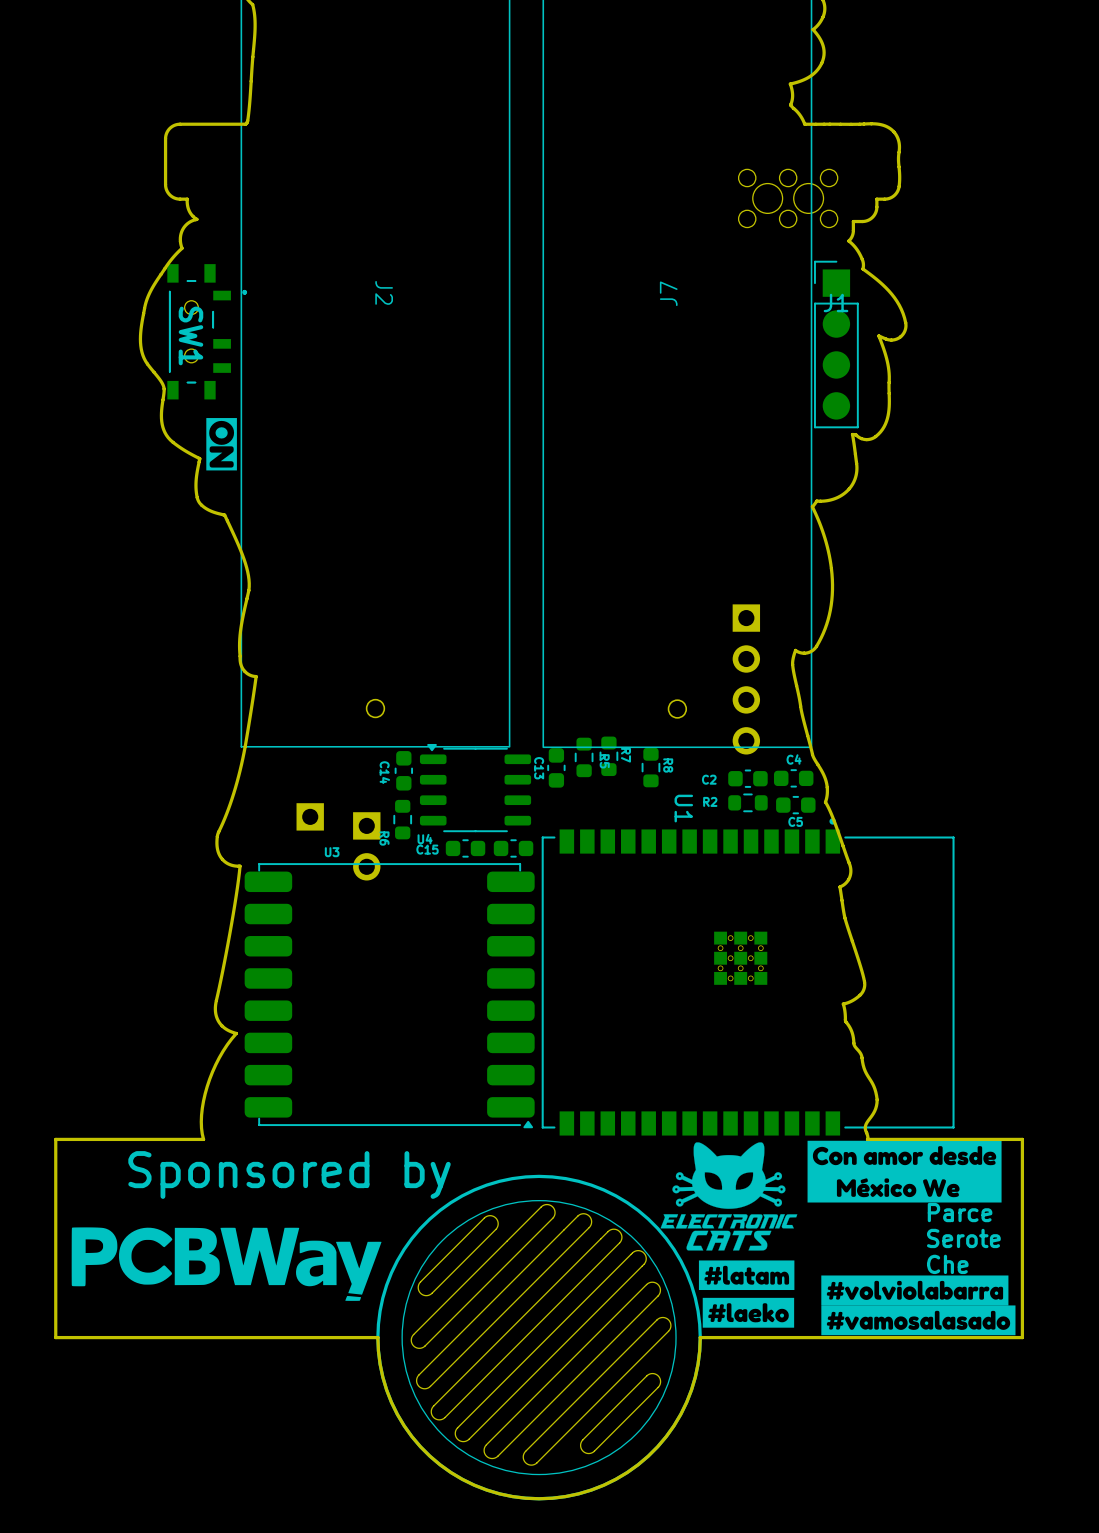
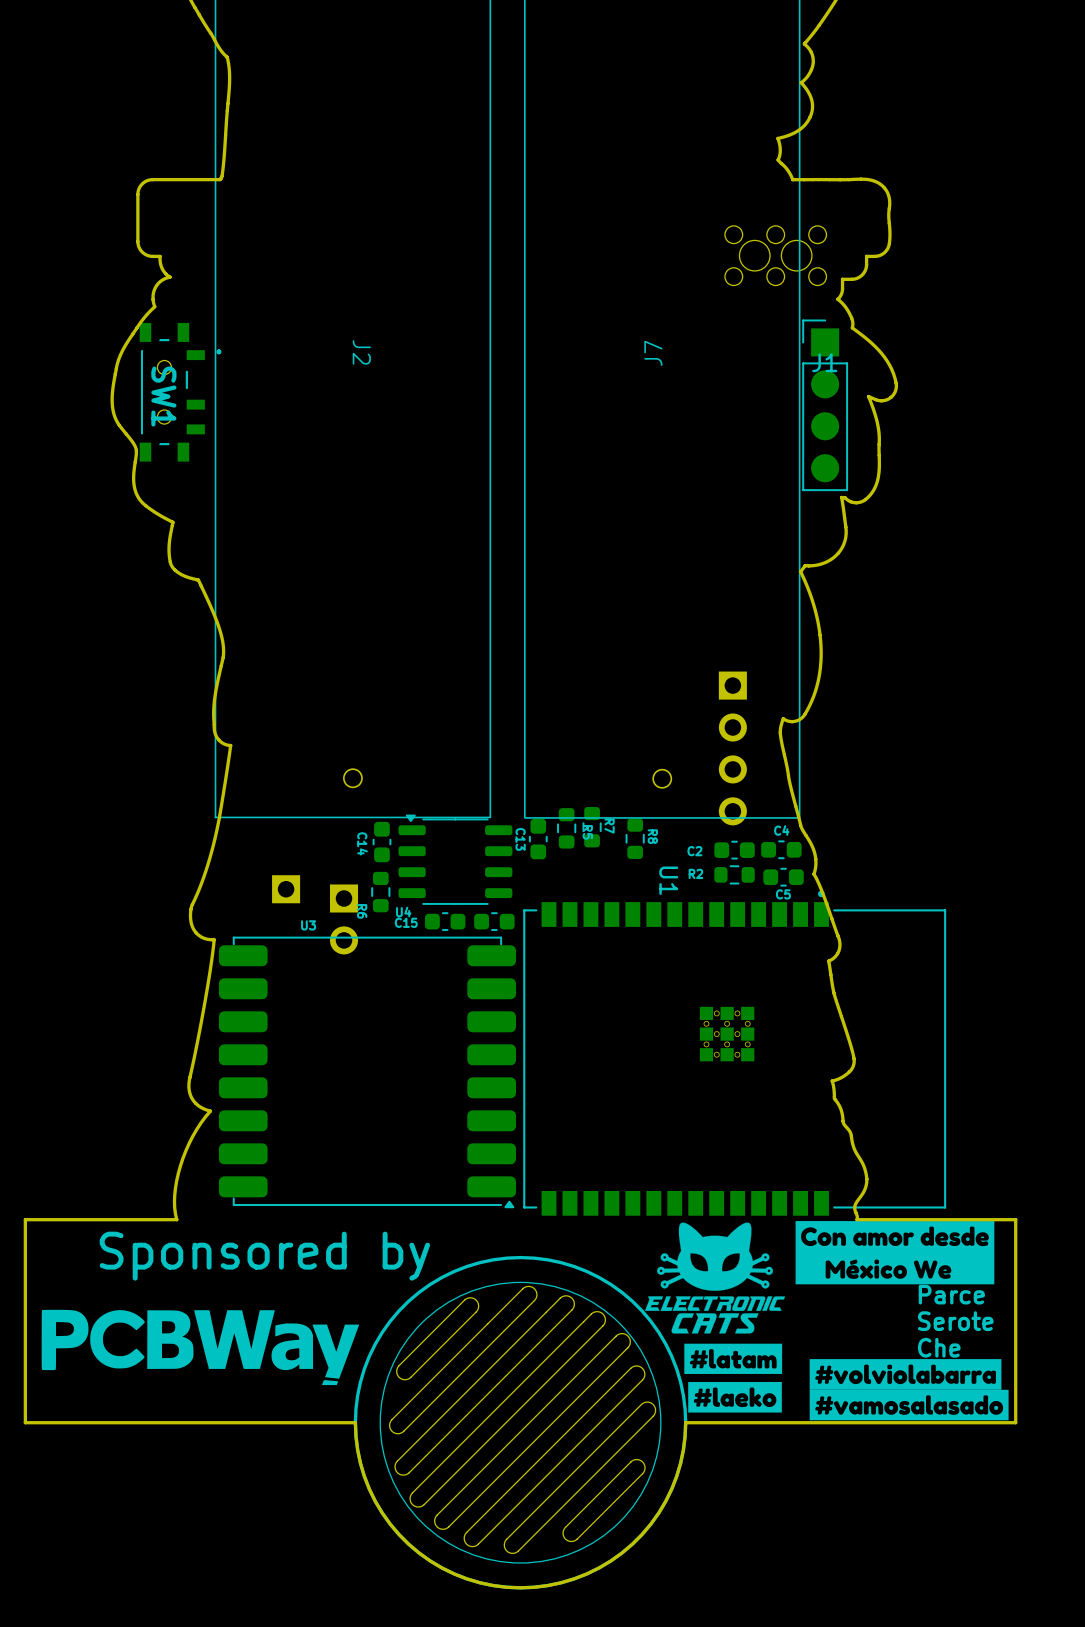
drawing: [206, 418, 237, 471] -> none

